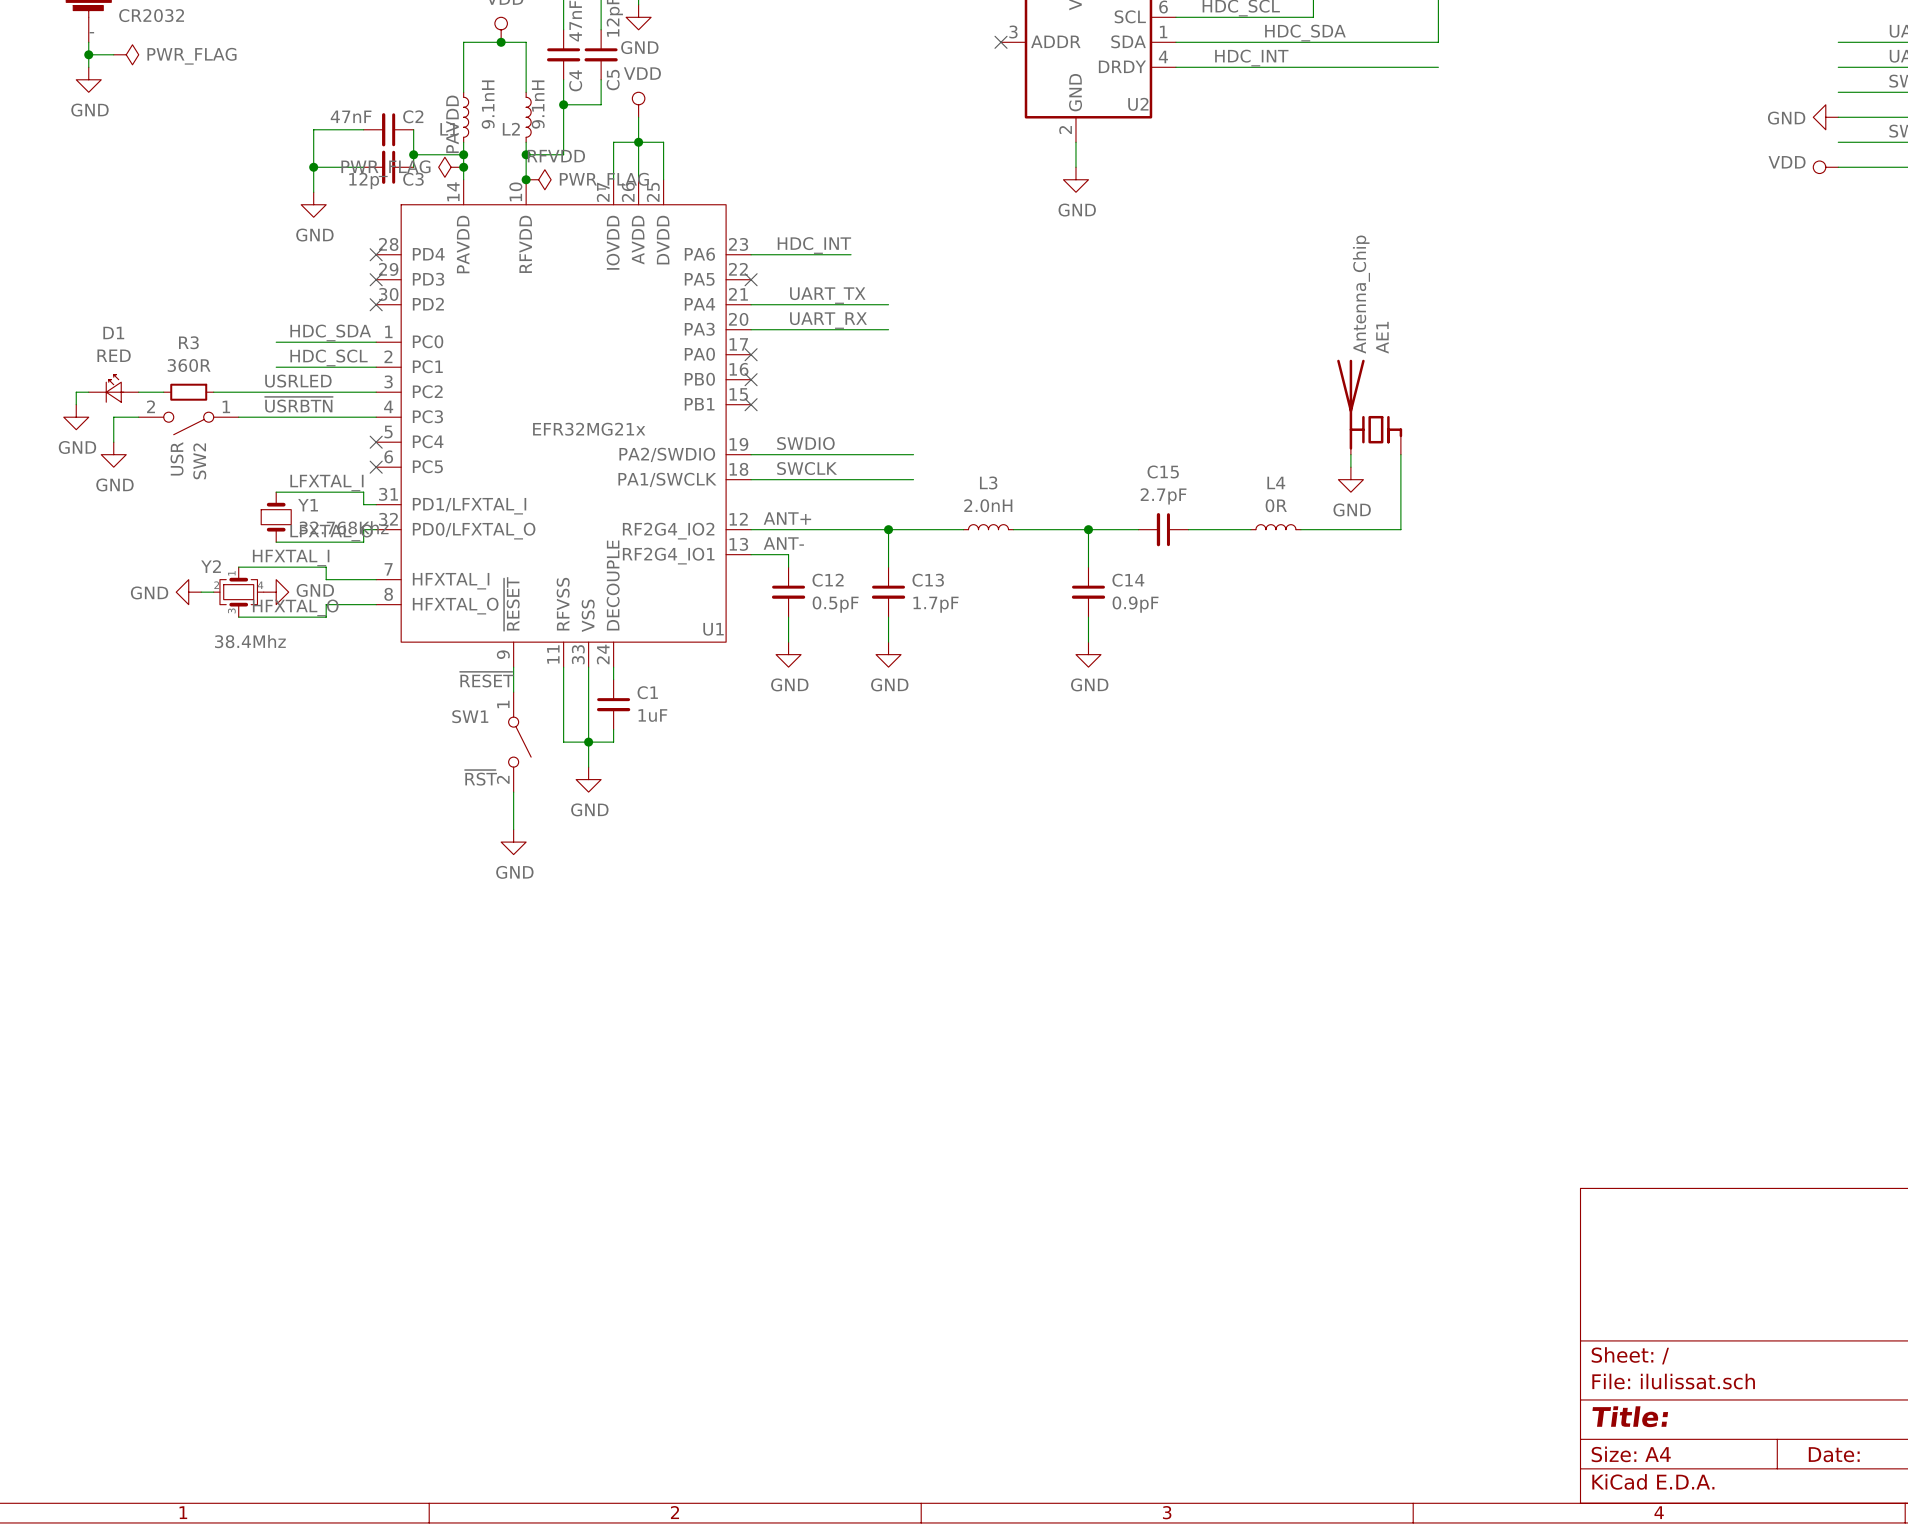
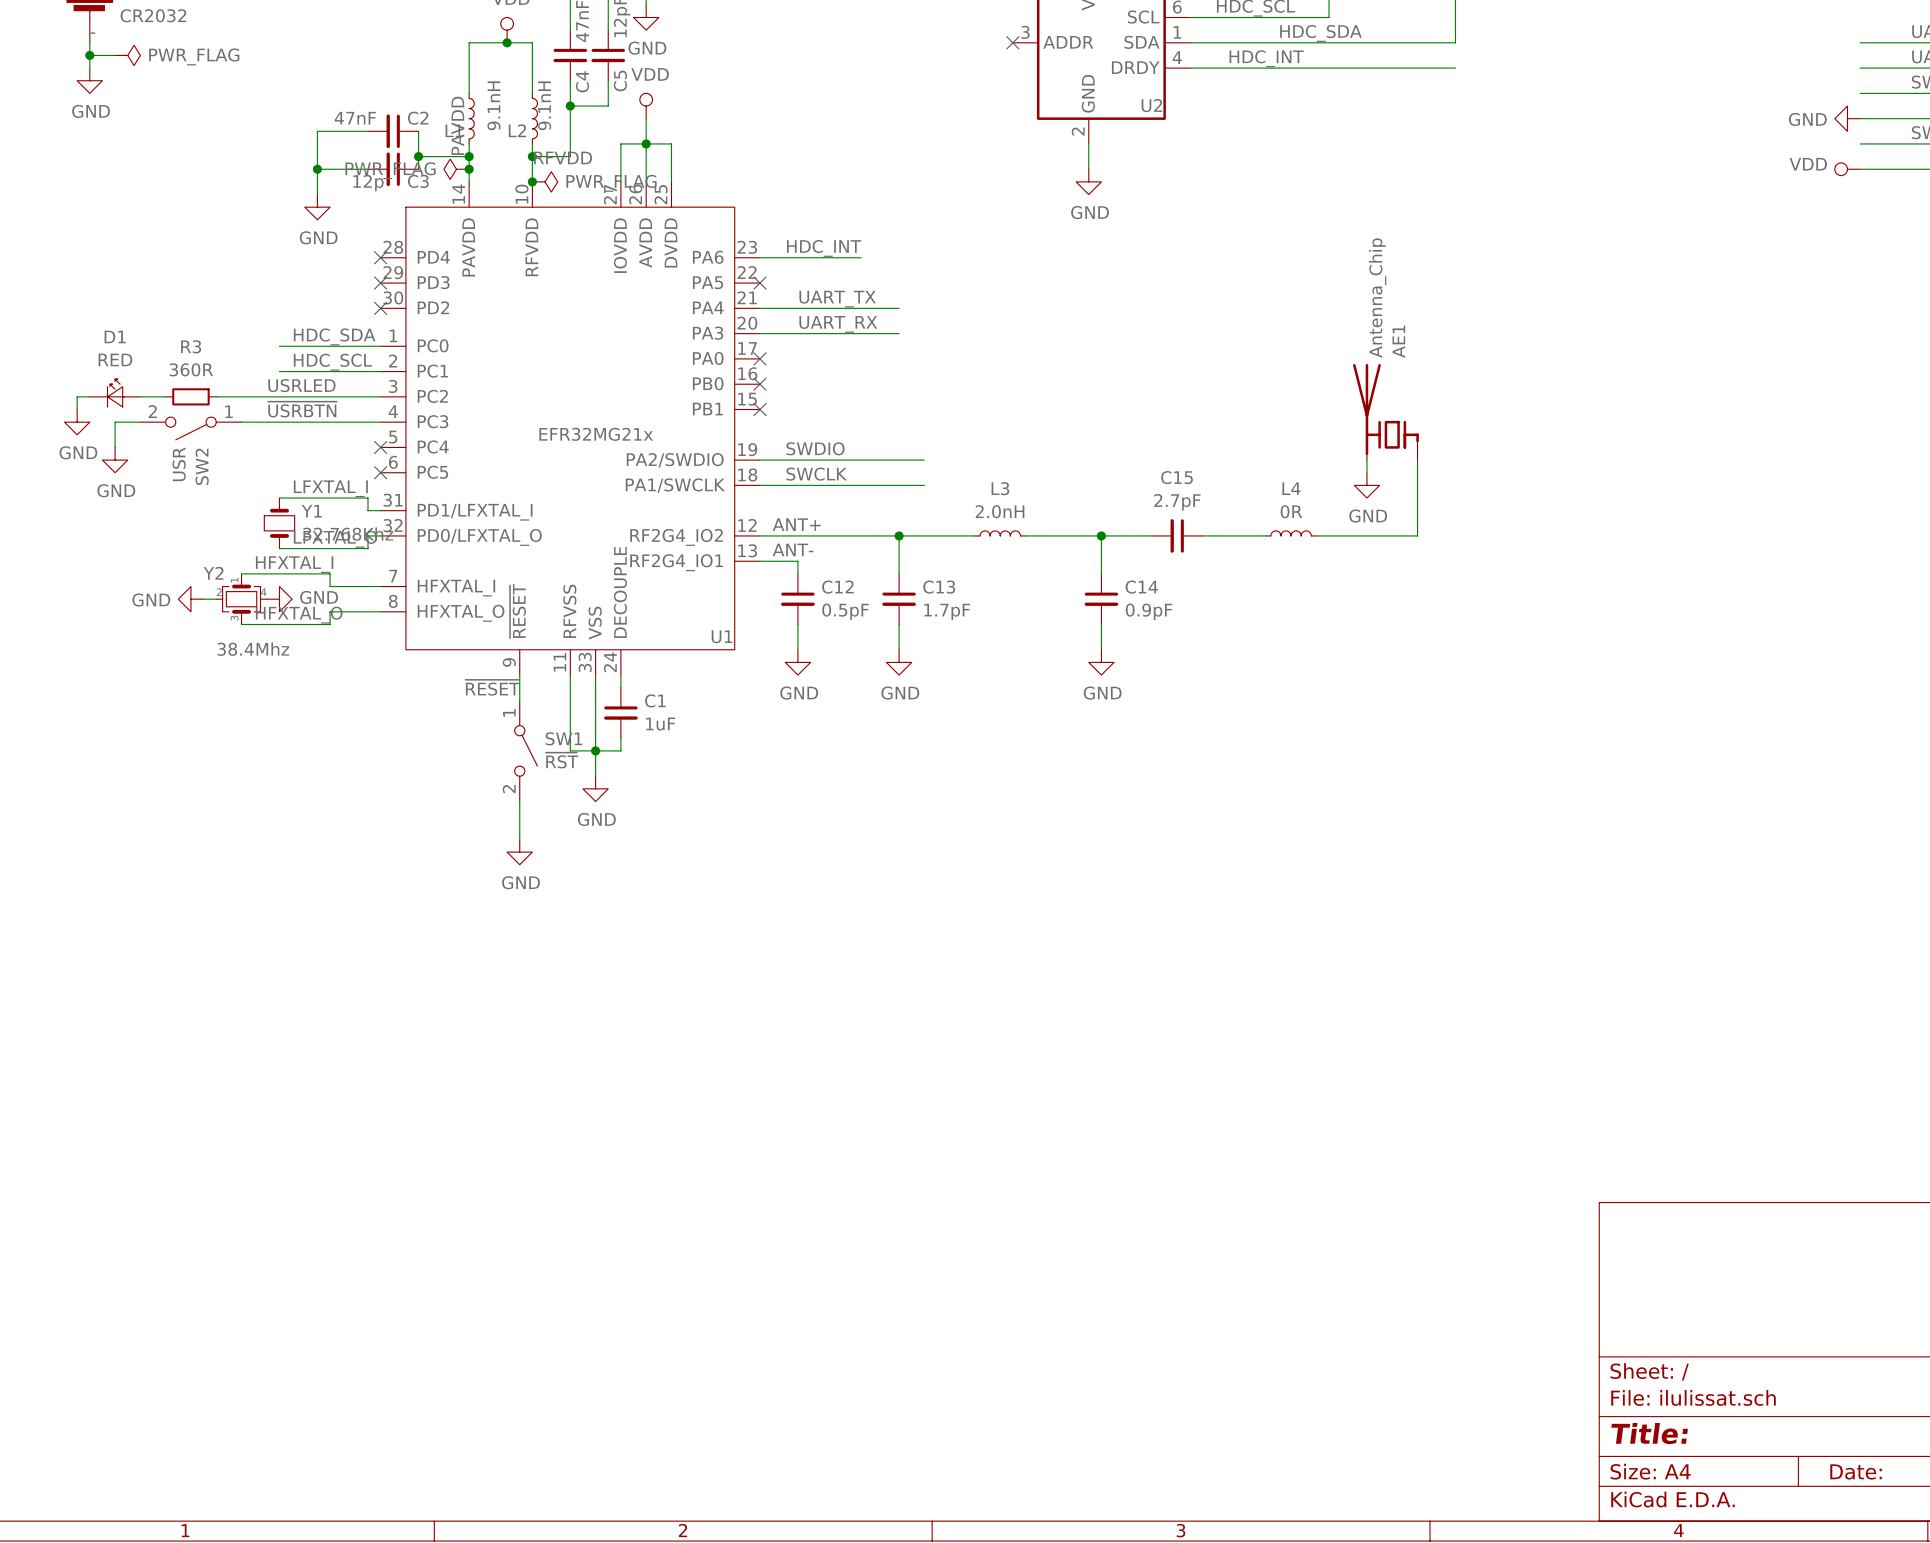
SW1 name position: SW1 (470, 716) -> SW1 (563, 738)
SW1 value position: ~{RST} (480, 777) -> ~{RST} (562, 760)

